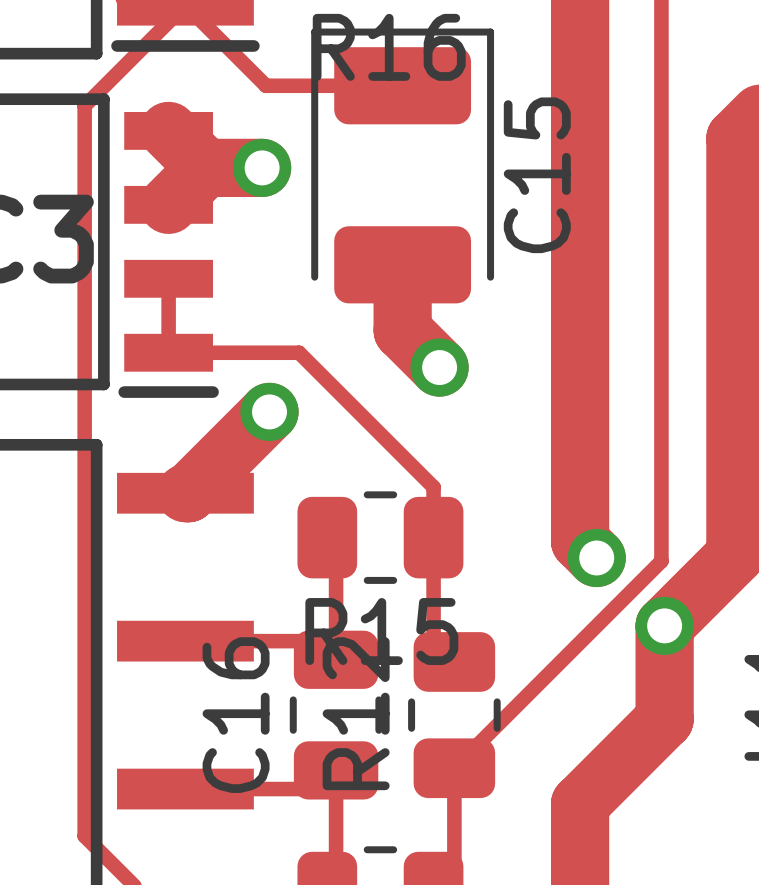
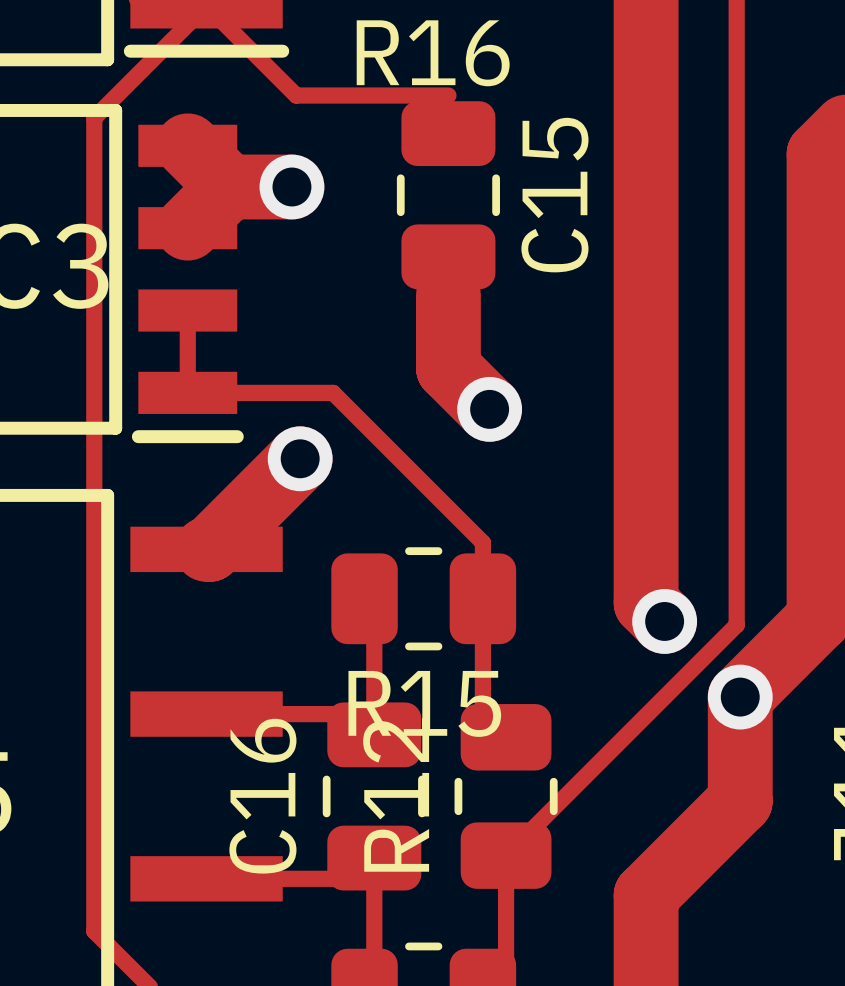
C15 footprint: [311, 28, 495, 304] -> [396, 101, 500, 290]

